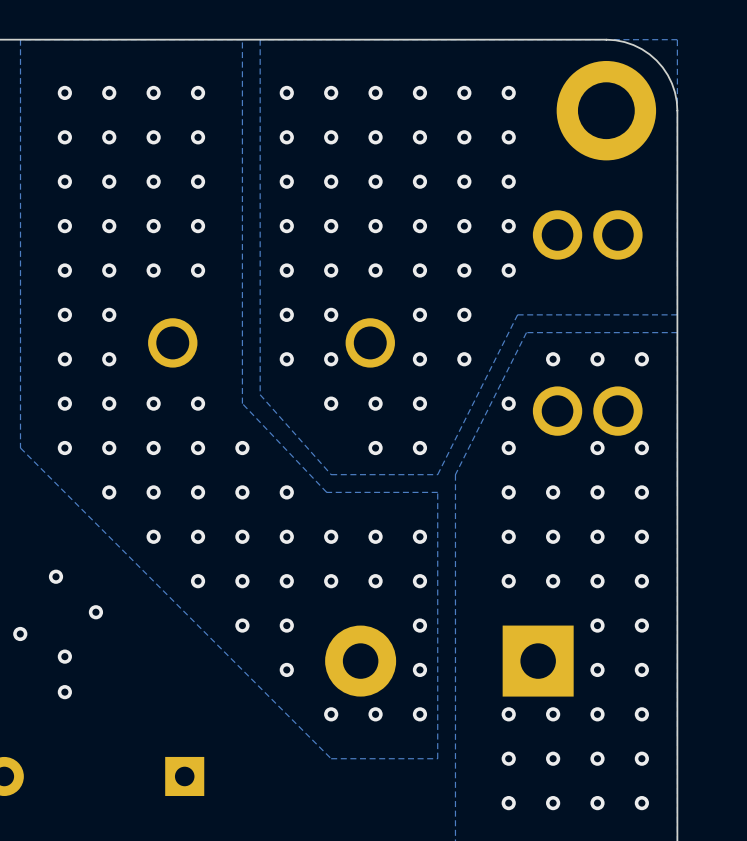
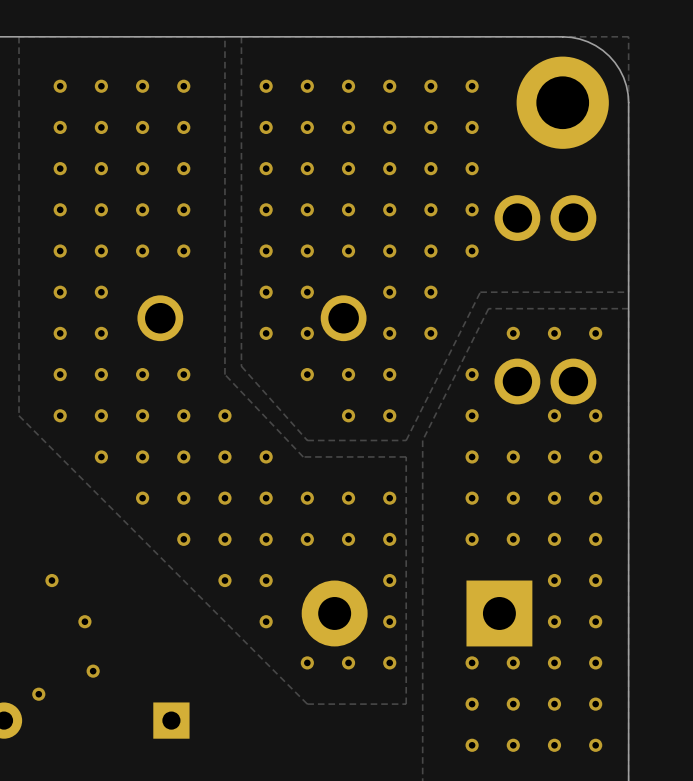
via: (56, 576) -> none
via: (95, 612) -> none
via: none -> (51, 580)
via: (20, 633) -> none
via: (64, 656) -> none
via: none -> (84, 621)
via: (64, 692) -> none
via: none -> (93, 671)
via: none -> (38, 694)

